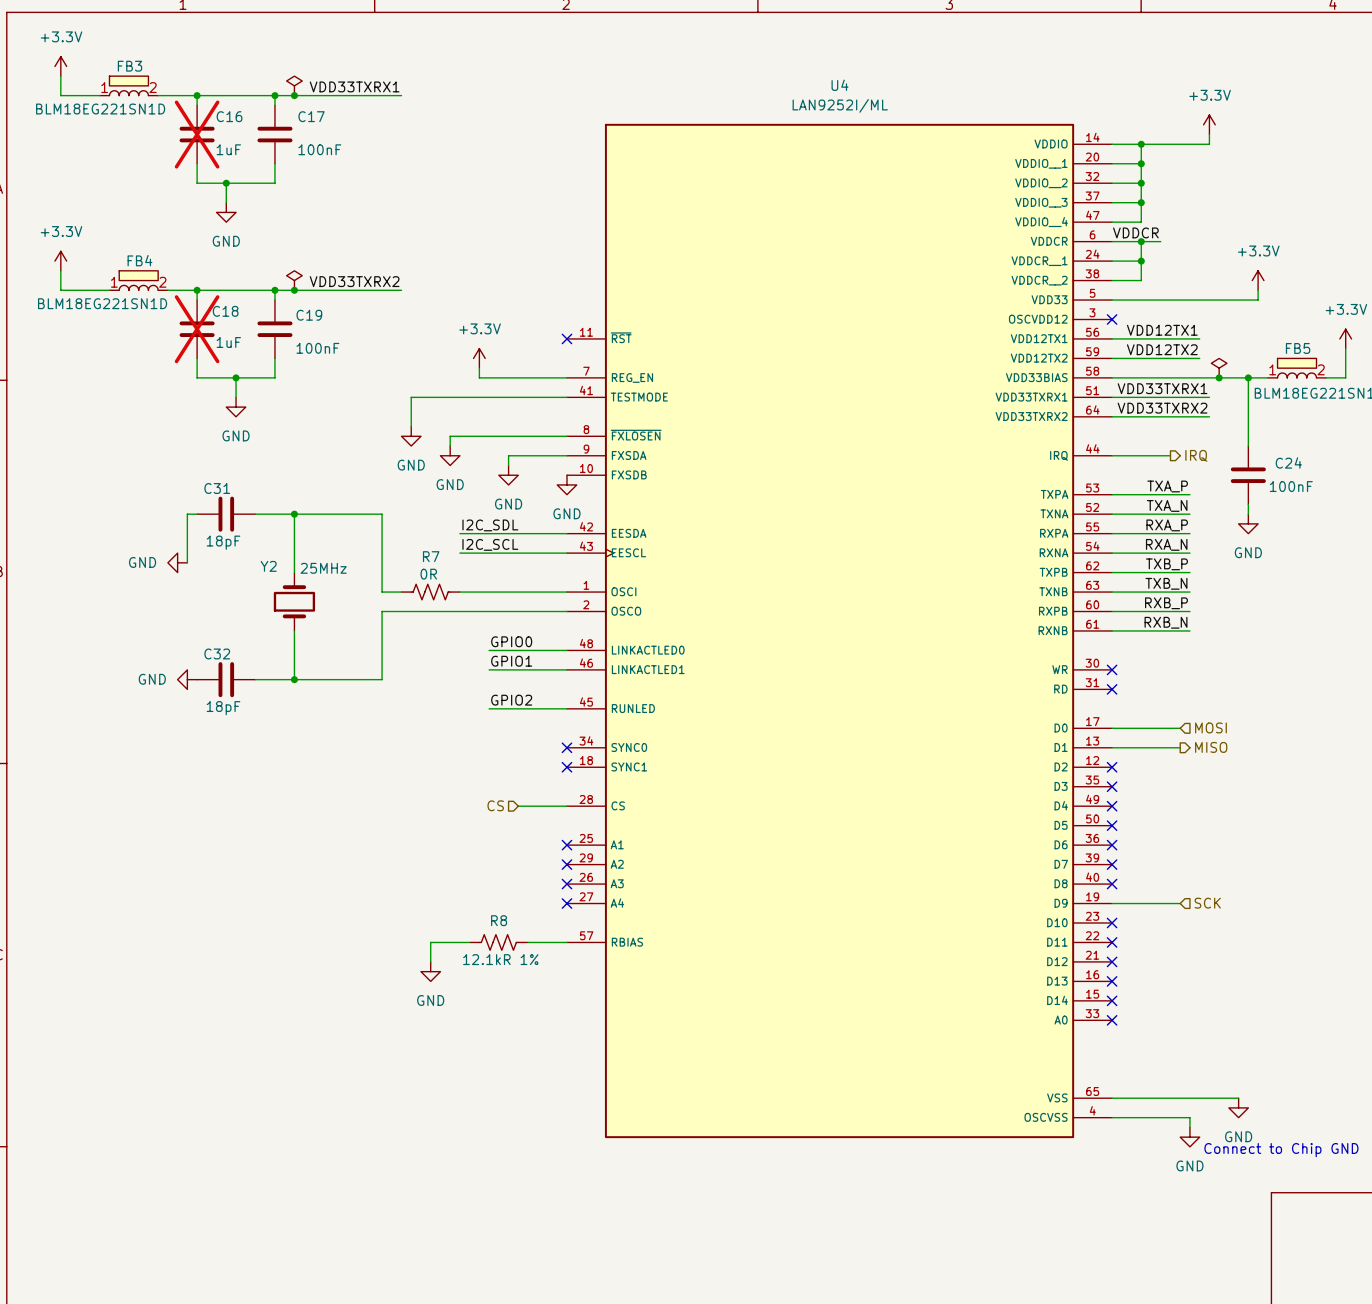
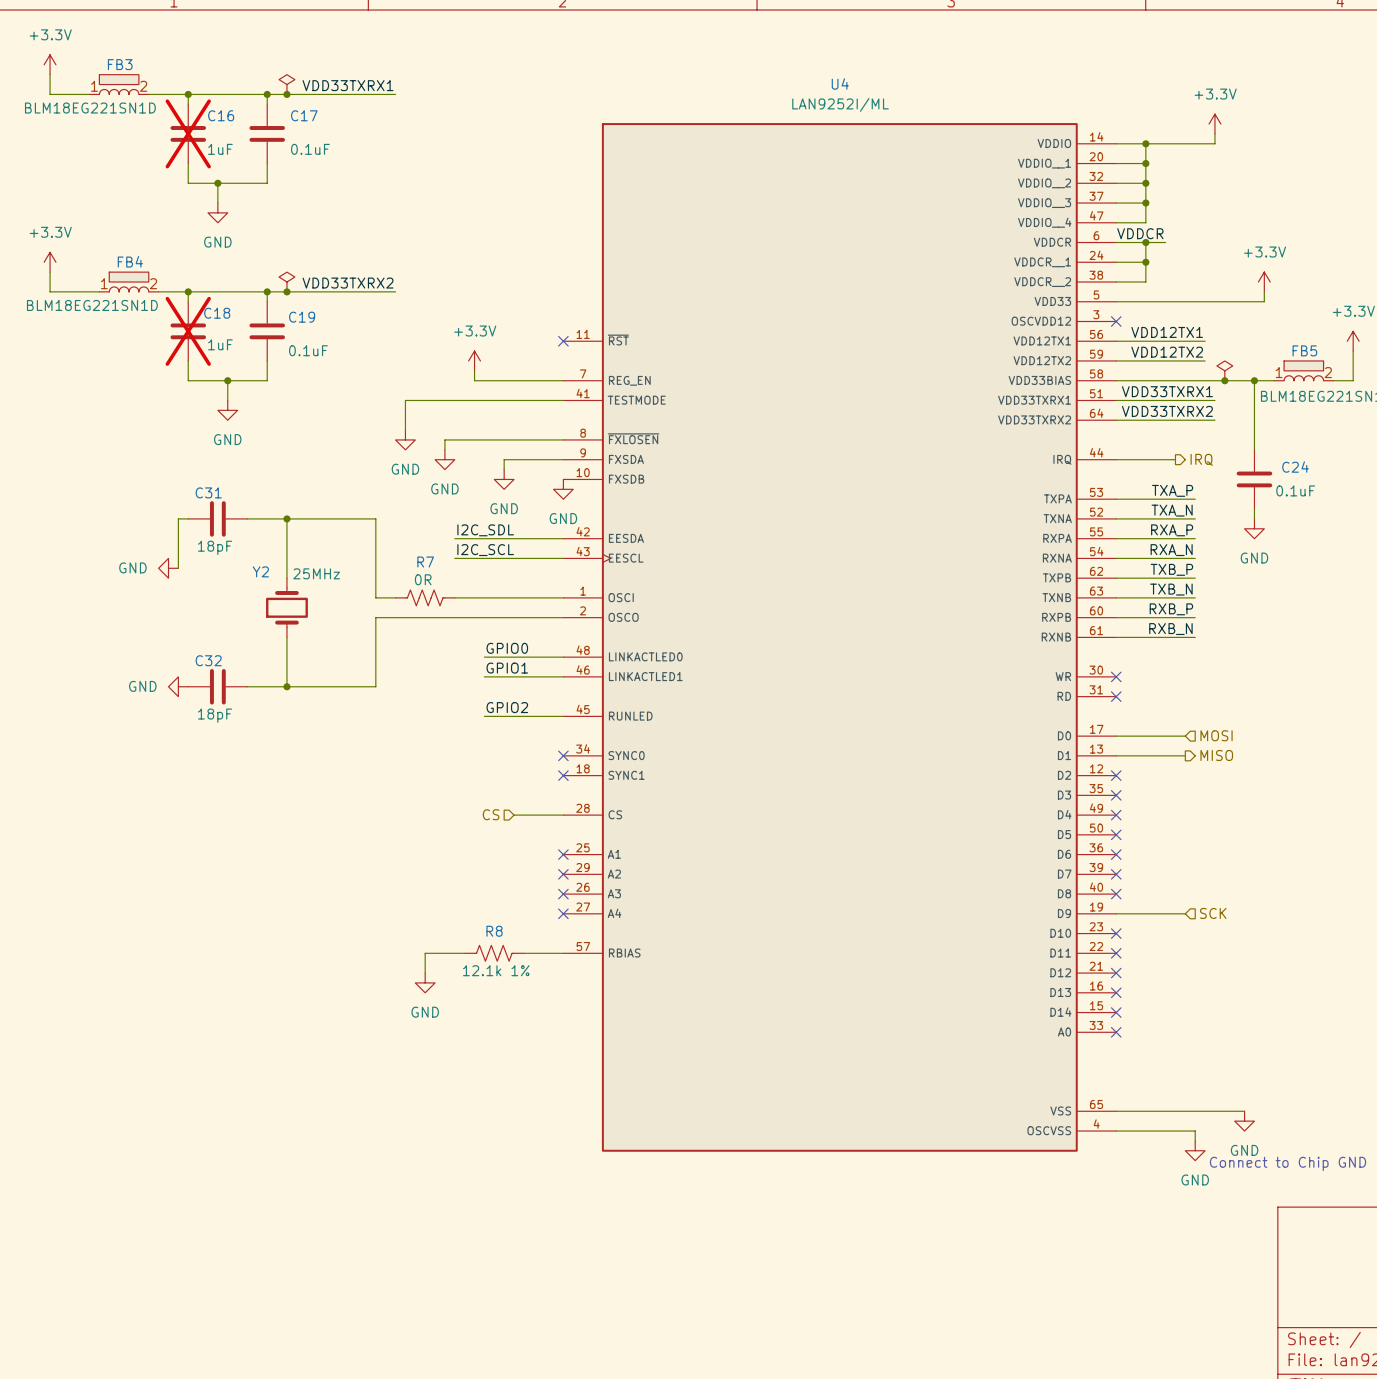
C17 value: 100nF (319, 149) -> 0.1uF (310, 149)
C19 value: 100nF (317, 348) -> 0.1uF (308, 350)
C24 value: 100nF (1291, 486) -> 0.1uF (1295, 490)
R8 value: 12.1kR 1% (500, 959) -> 12.1k 1% (496, 970)

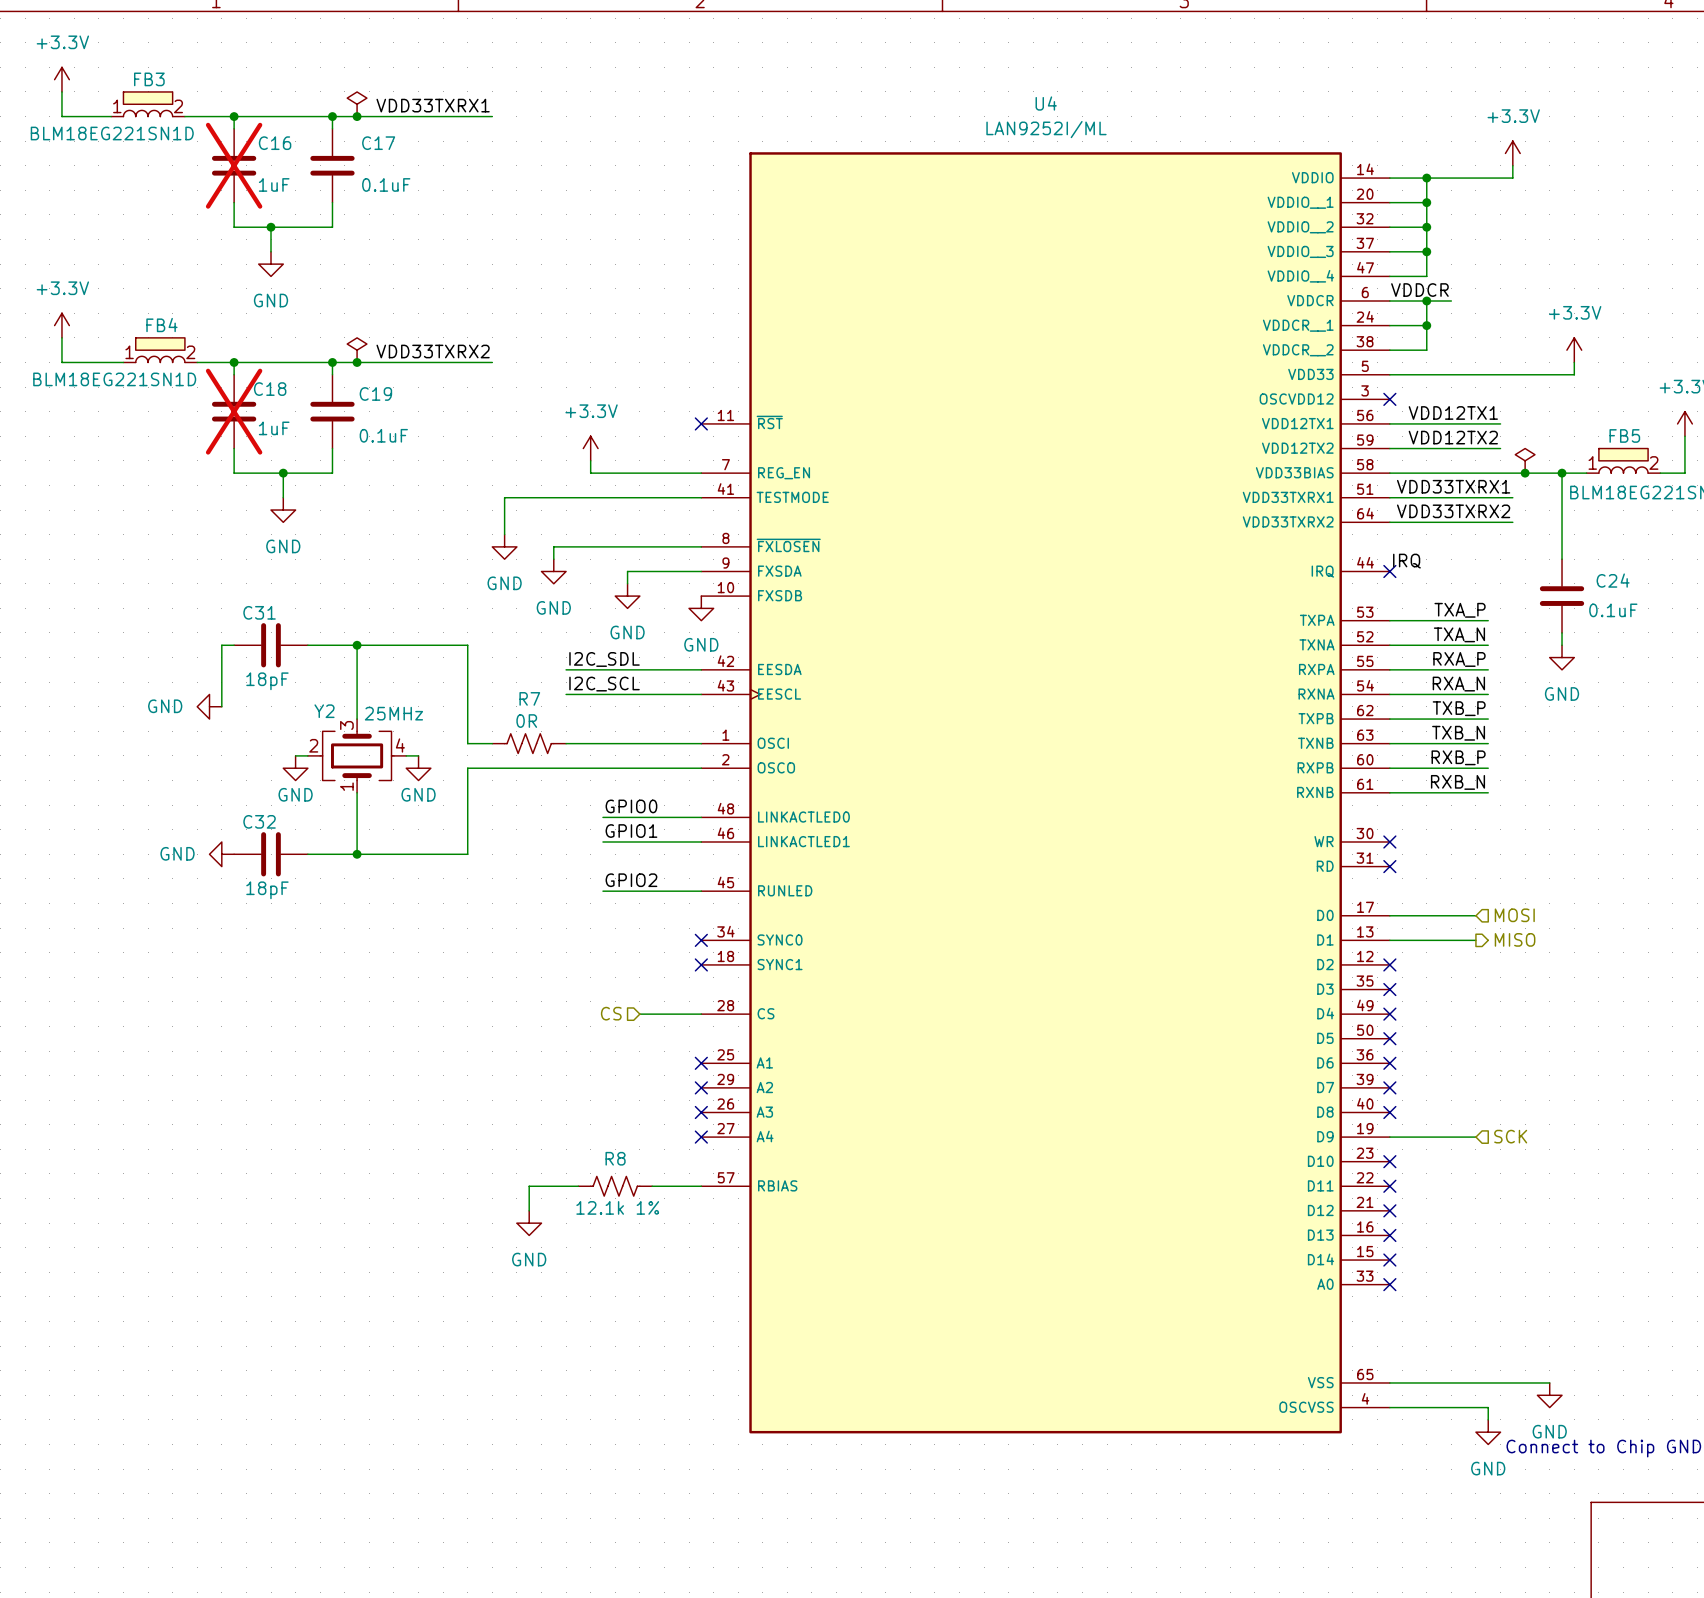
label: none -> IRQ (1406, 561)
wire: (1116, 459) (1175, 459) -> none
no-connect mark: none -> (1389, 571)
hierarchical label: IRQ (1201, 459) -> none
Y2 symbol: [266, 578, 308, 638] -> [307, 719, 407, 793]
wire: none -> (295, 755) (307, 755)
wire: none -> (406, 755) (418, 755)
power symbol: none -> GND (295, 768)
power symbol: none -> GND (418, 768)

